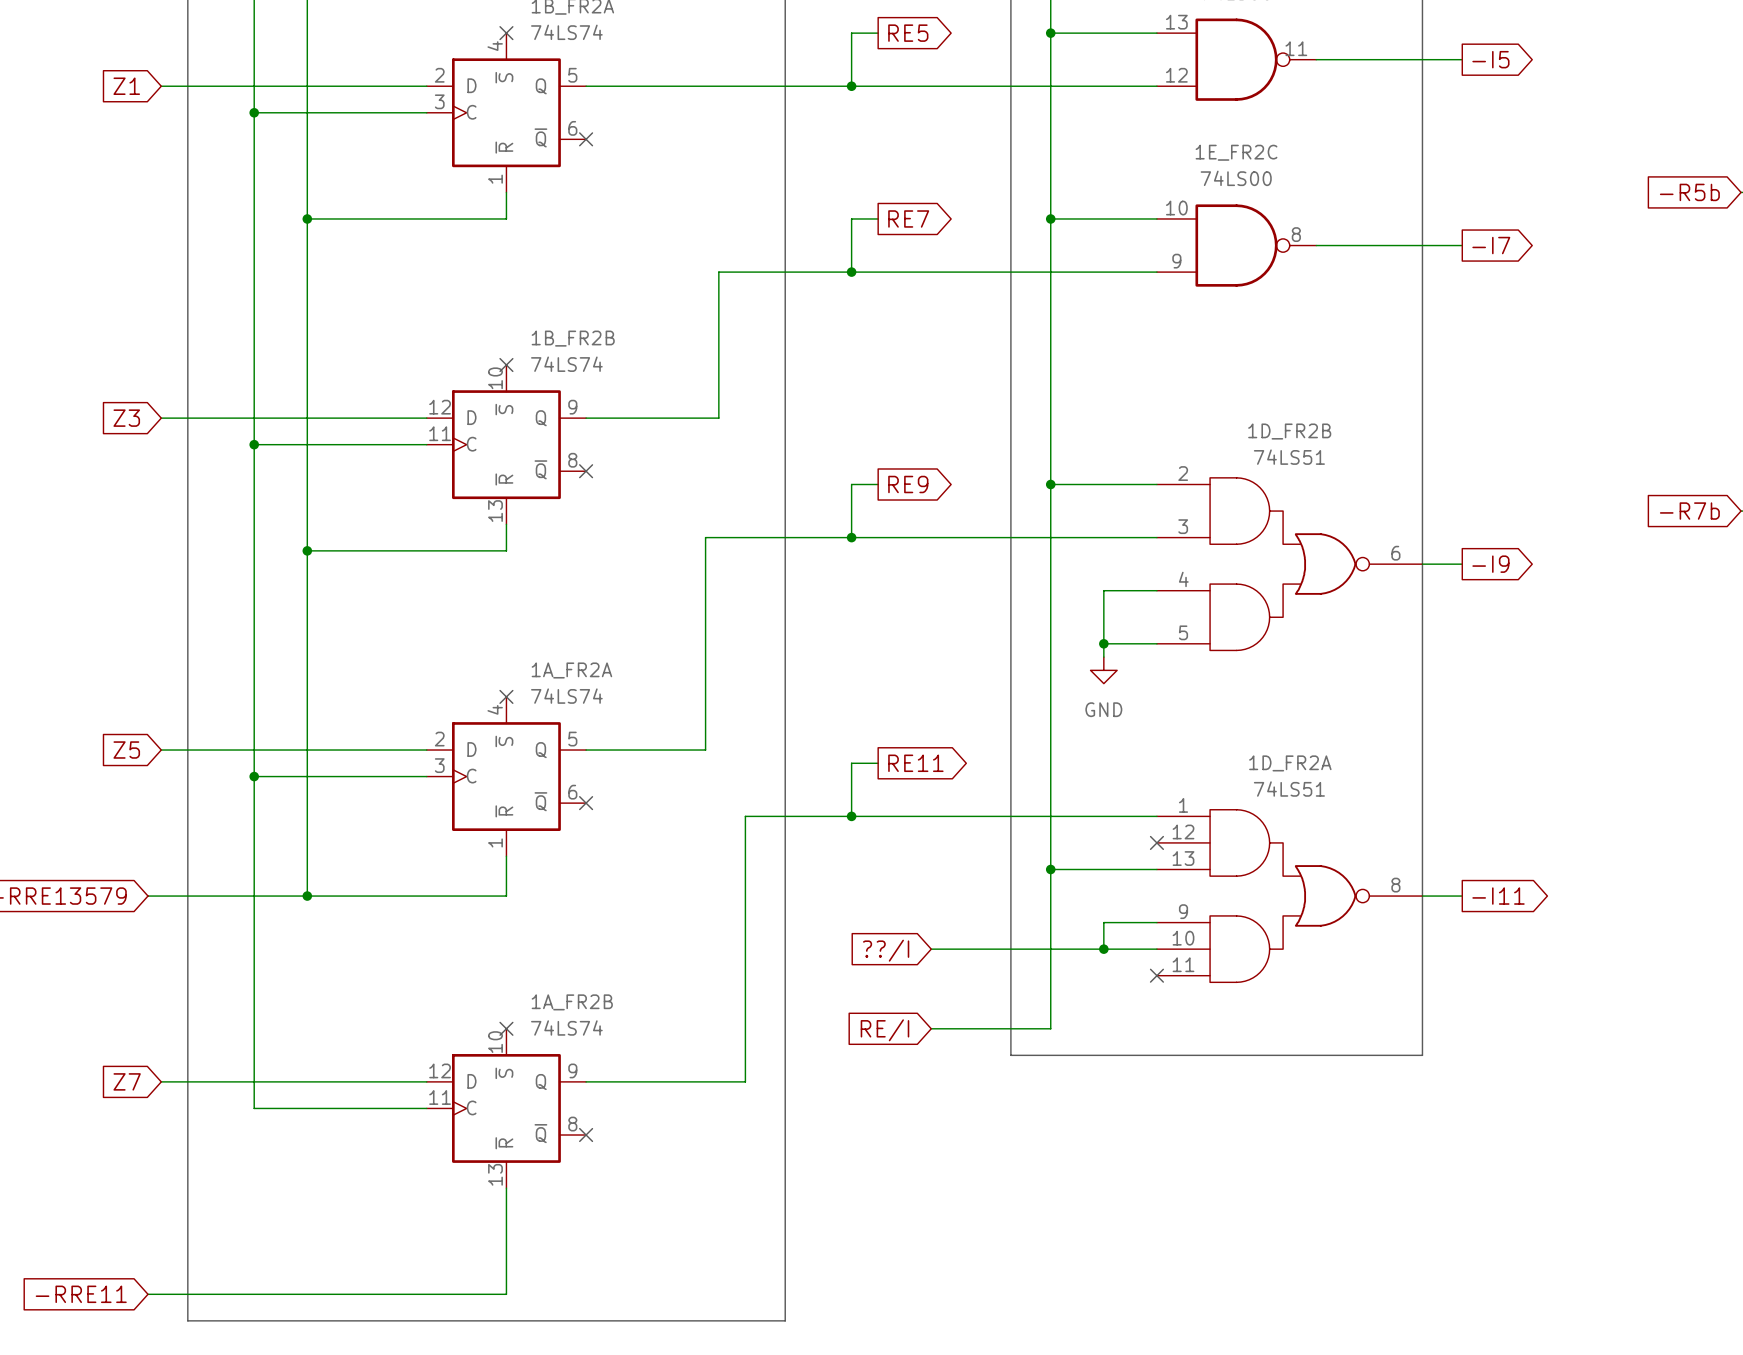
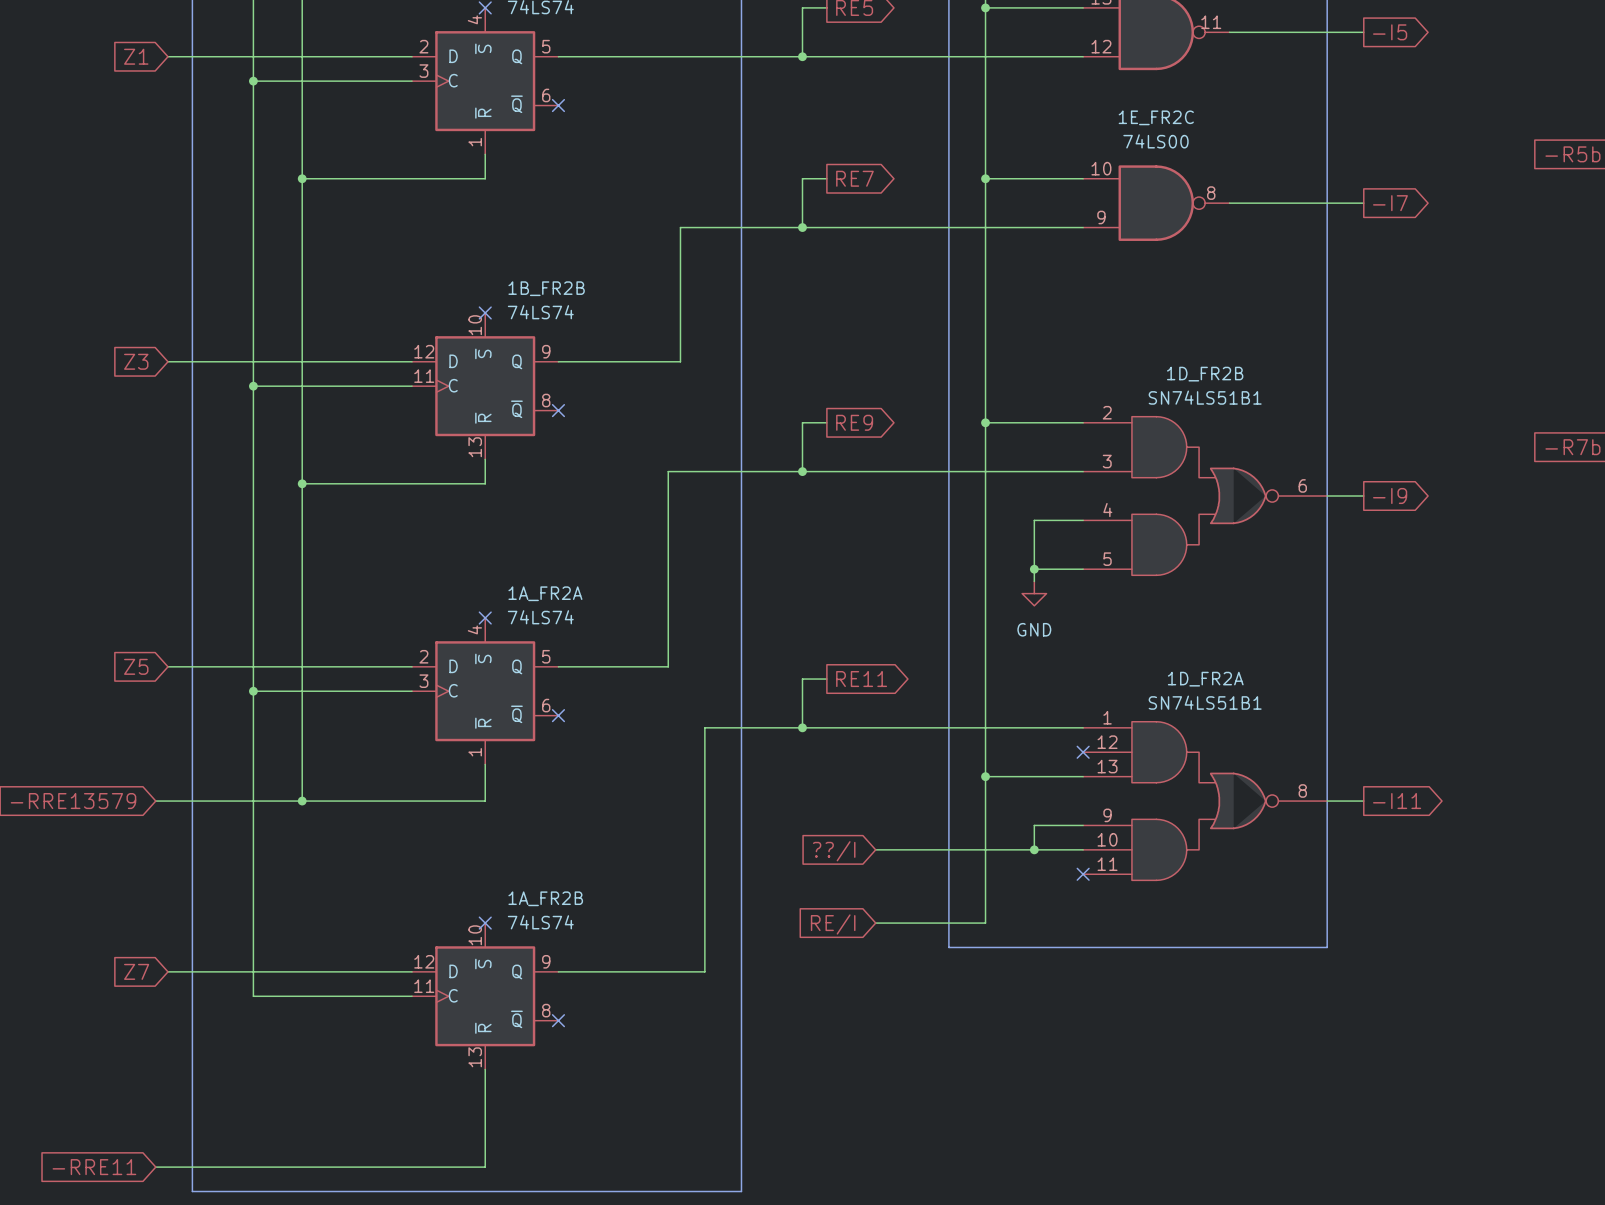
1D_FR2B value: 74LS51 (1289, 457) -> SN74LS51B1 (1205, 397)
1D_FR2A value: 74LS51 (1289, 789) -> SN74LS51B1 (1205, 702)

